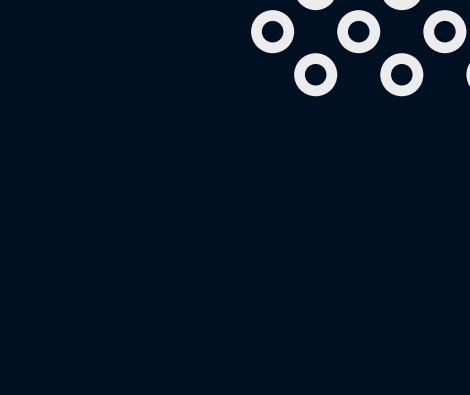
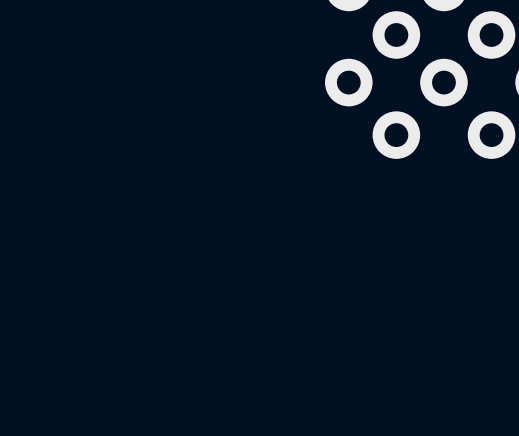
via: (272, 31) -> none
via: none -> (396, 135)
via: none -> (491, 135)

